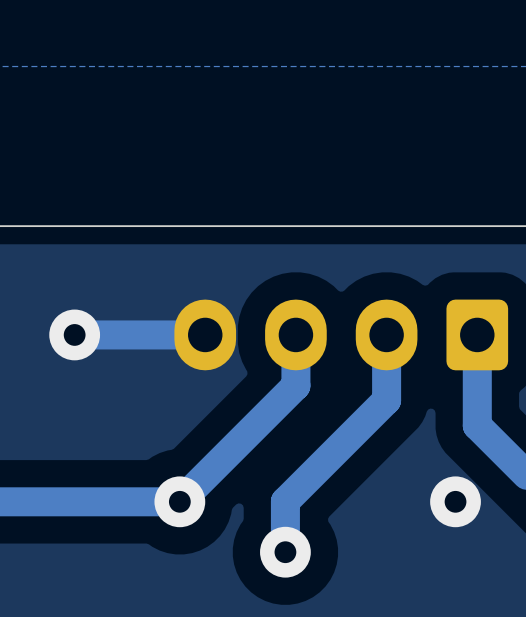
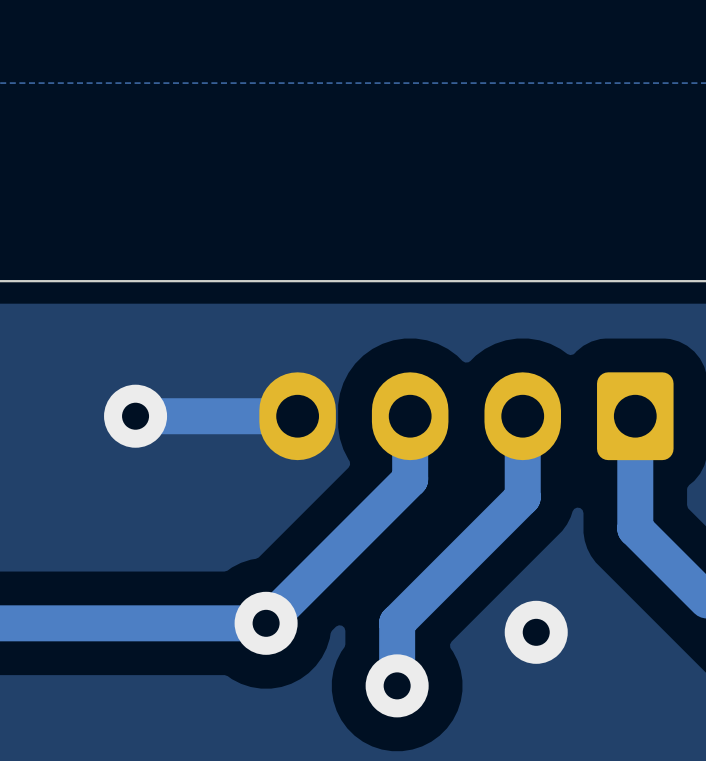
via position: (455, 501) -> (536, 632)

